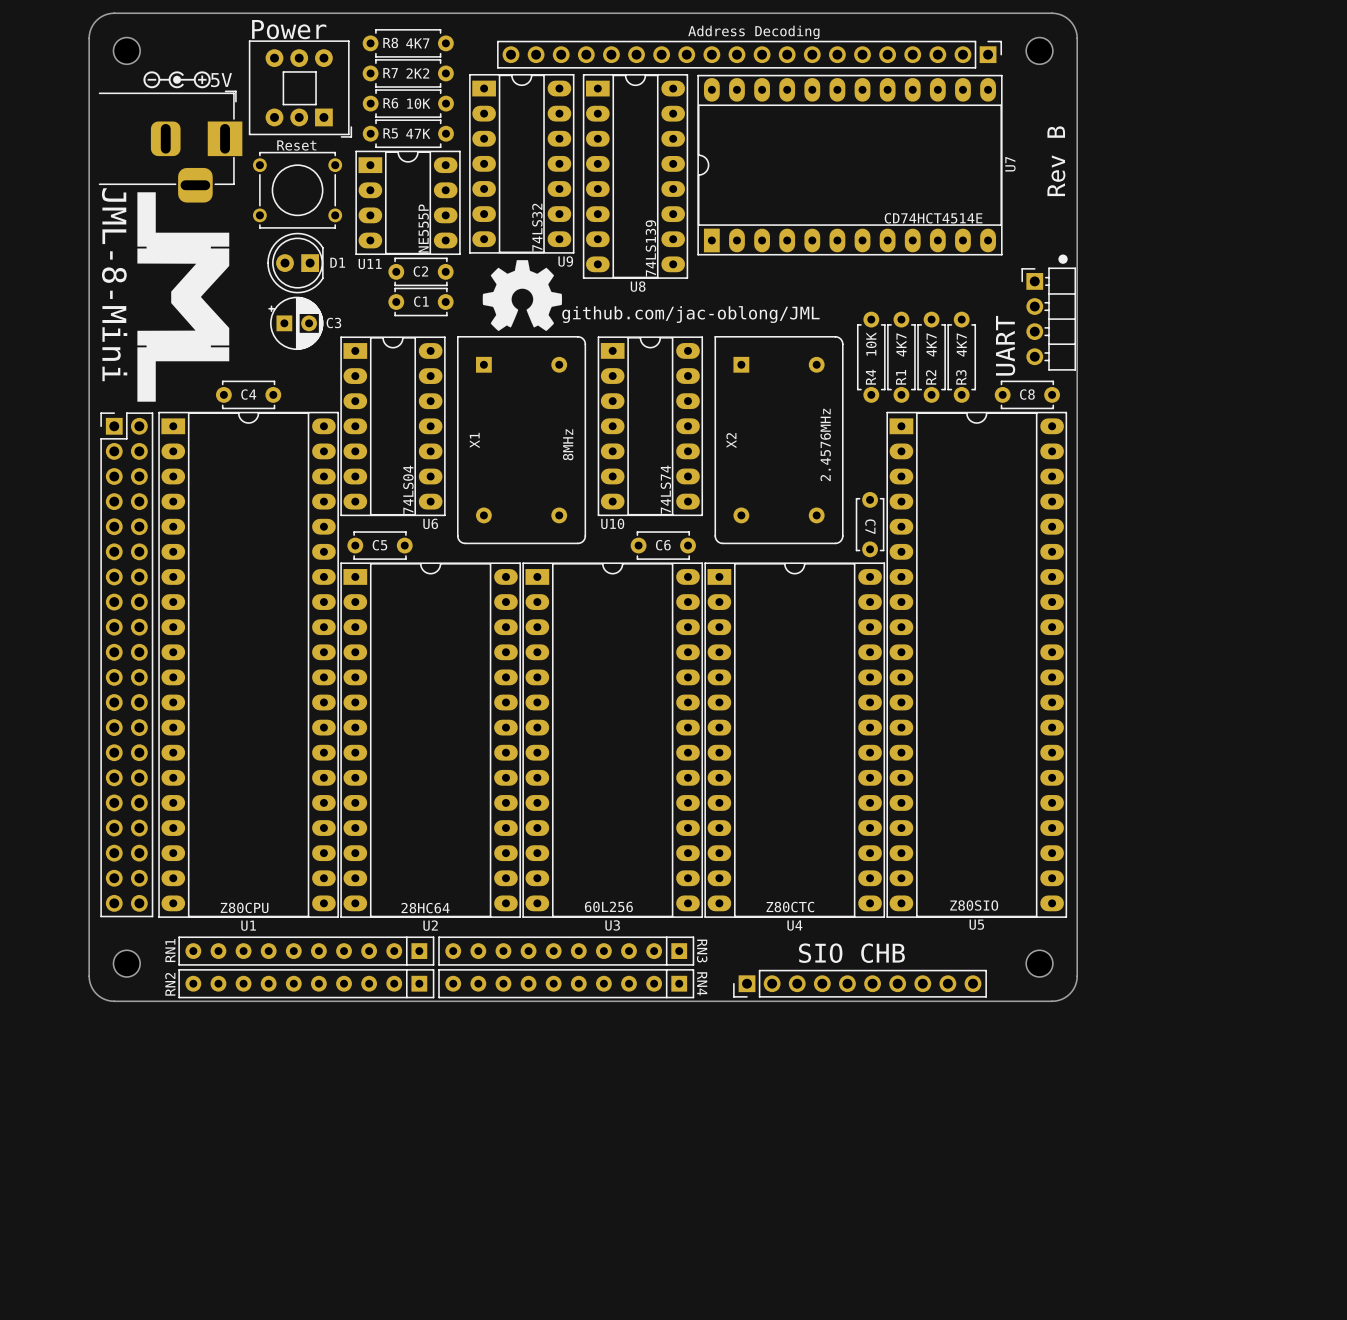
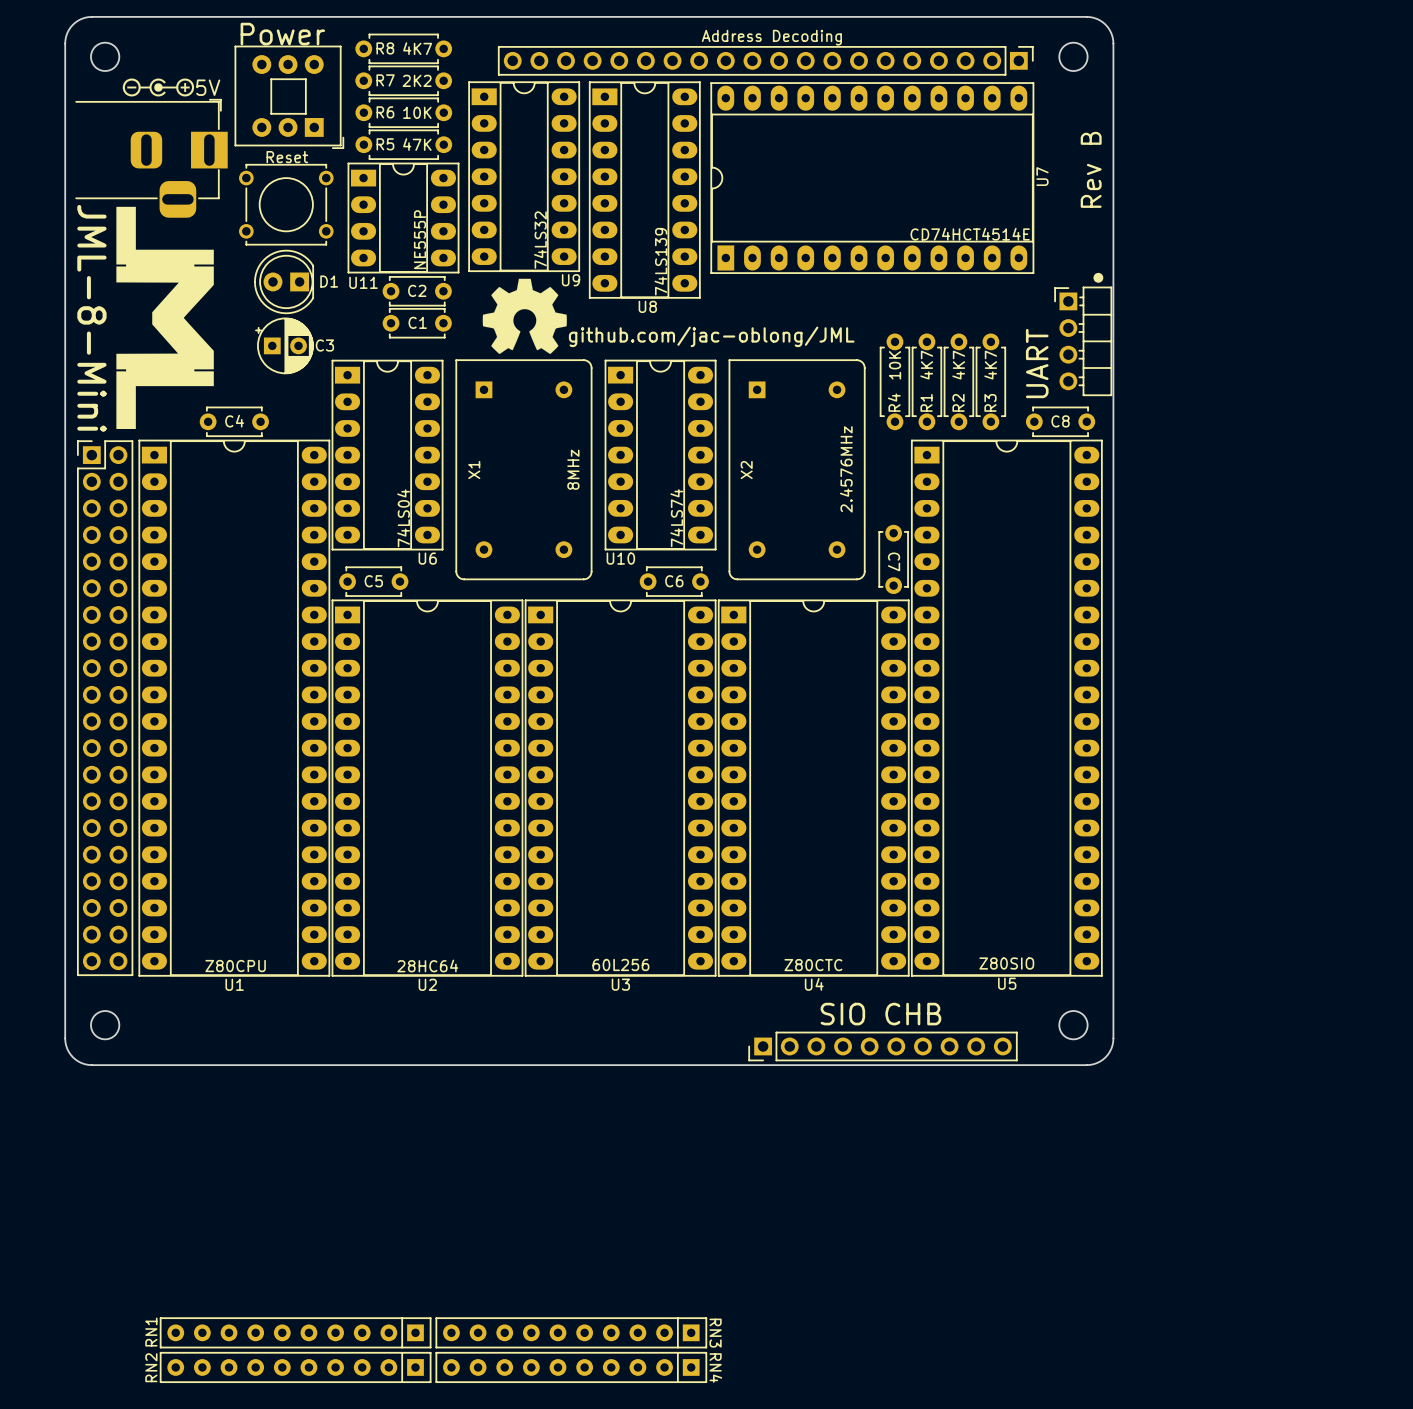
RN1 position: (306, 951) -> (295, 1332)
RN3 position: (566, 951) -> (571, 1332)
RN2 position: (306, 983) -> (295, 1367)
RN4 position: (566, 983) -> (571, 1367)

